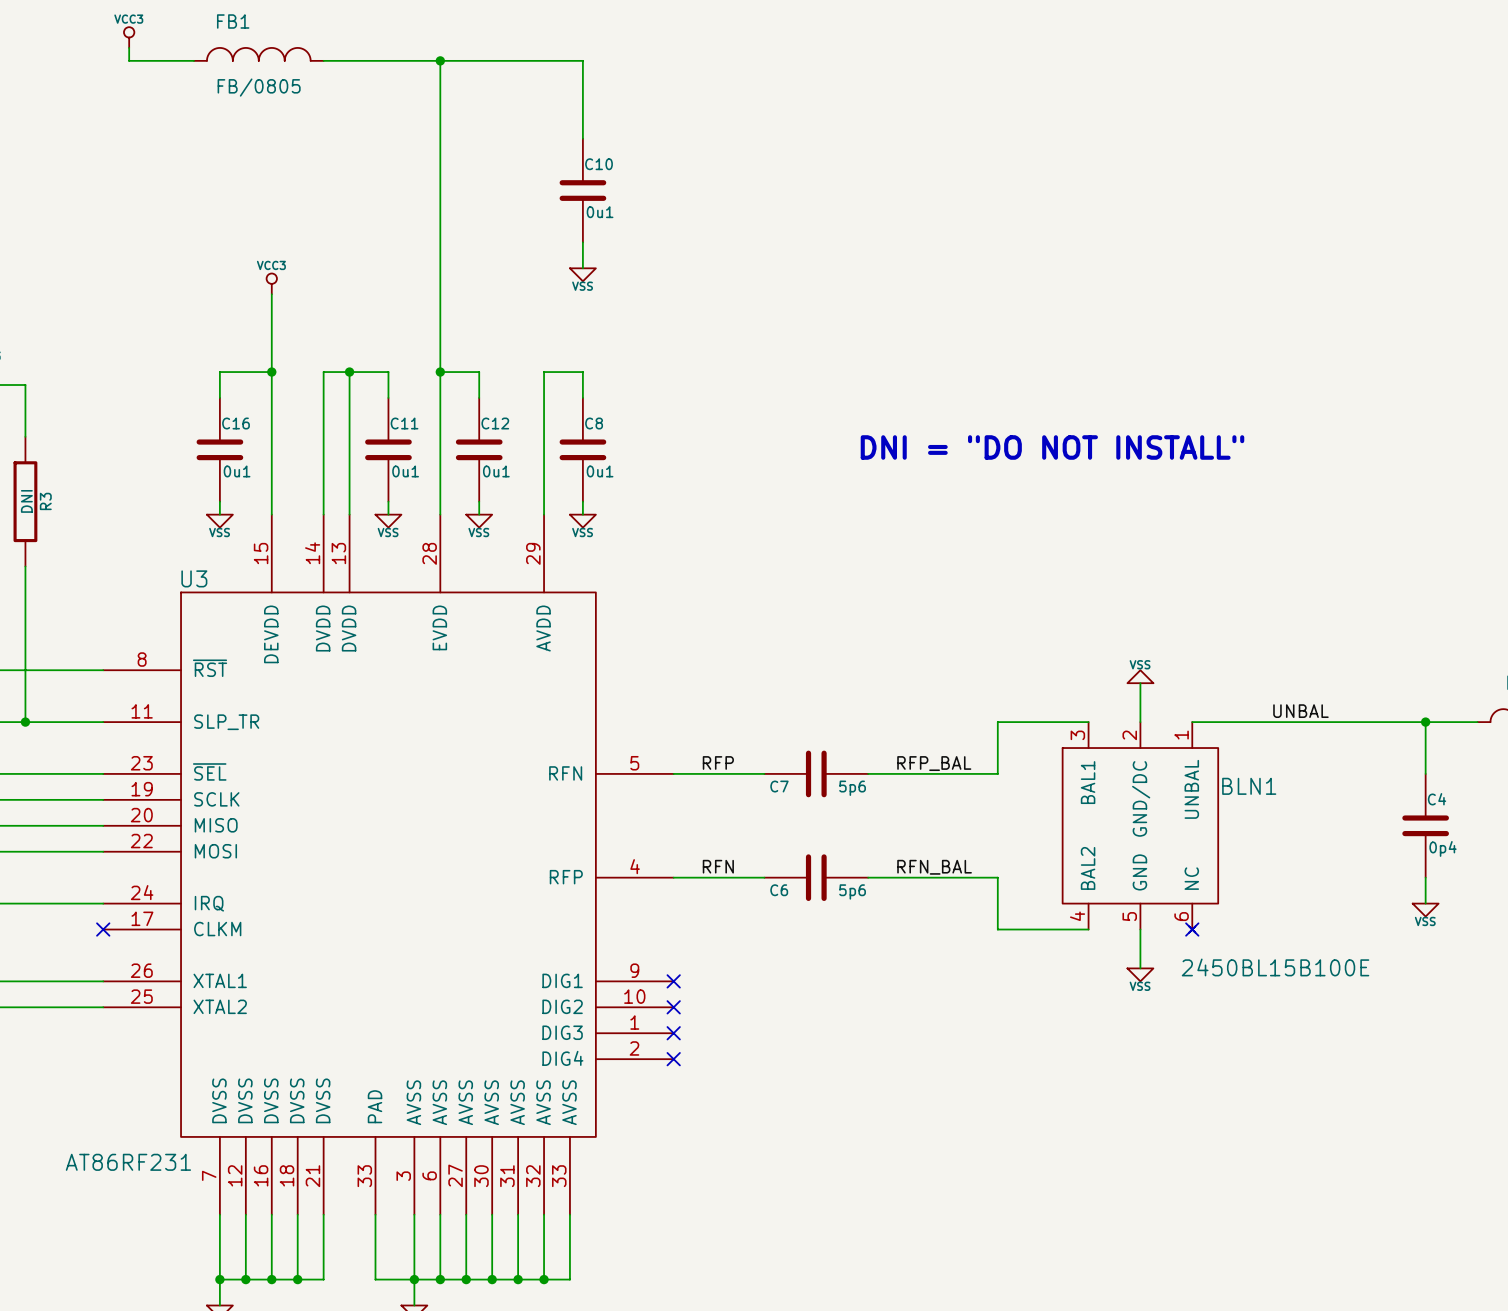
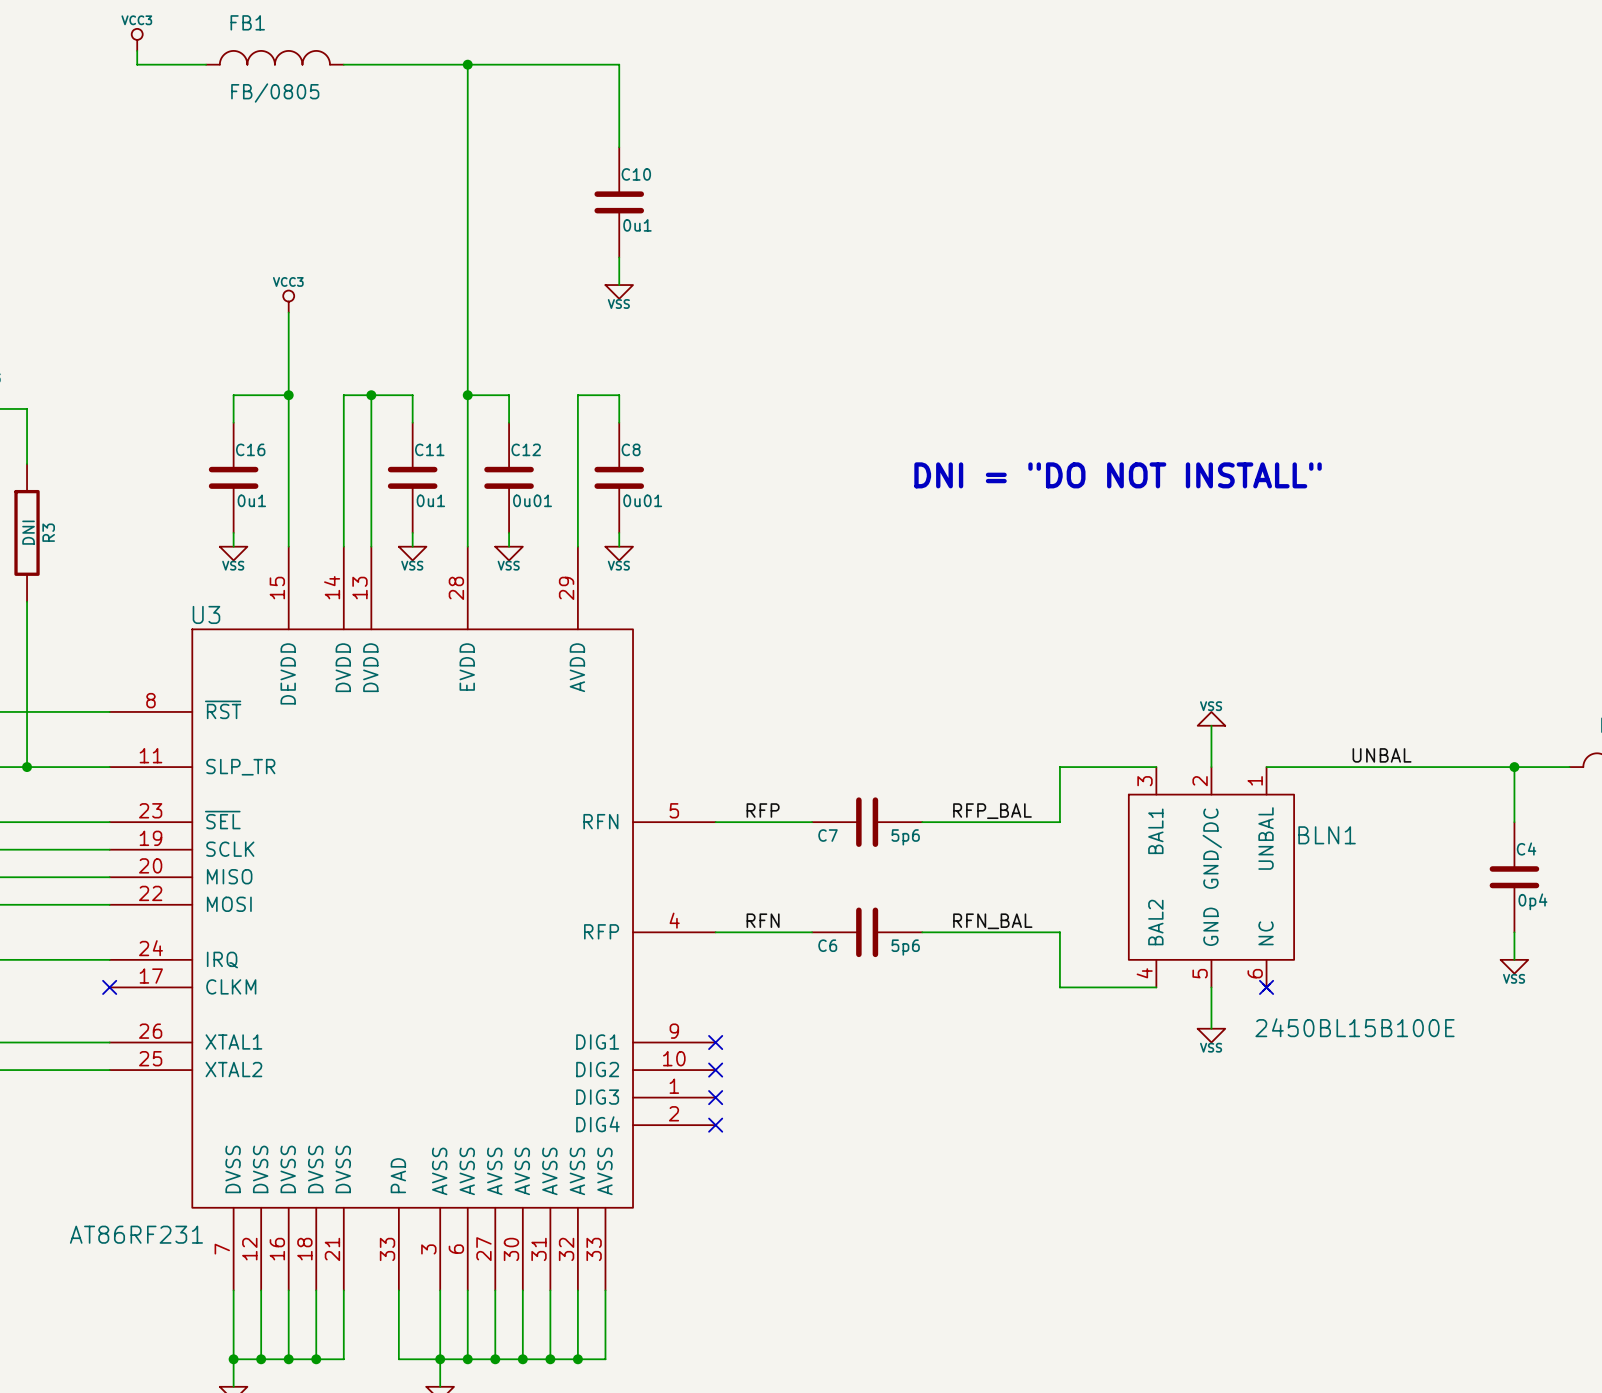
C12 value: 0u1 (496, 471) -> 0u01 (532, 500)
C8 value: 0u1 (600, 471) -> 0u01 (642, 500)

